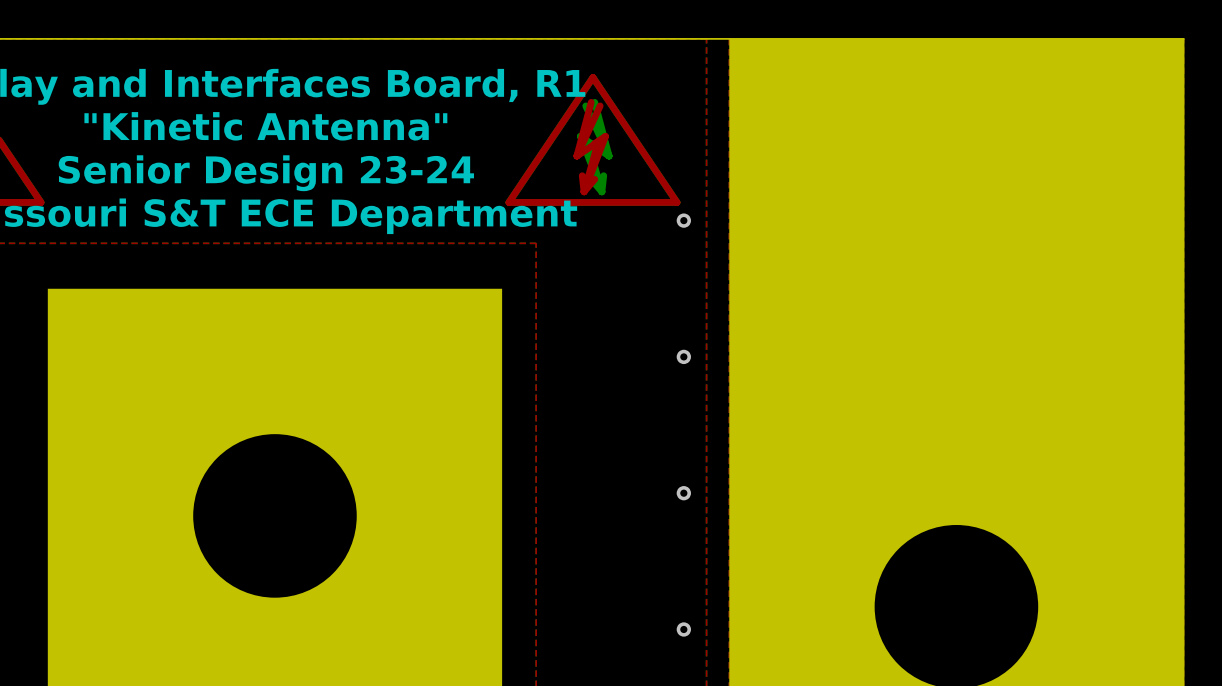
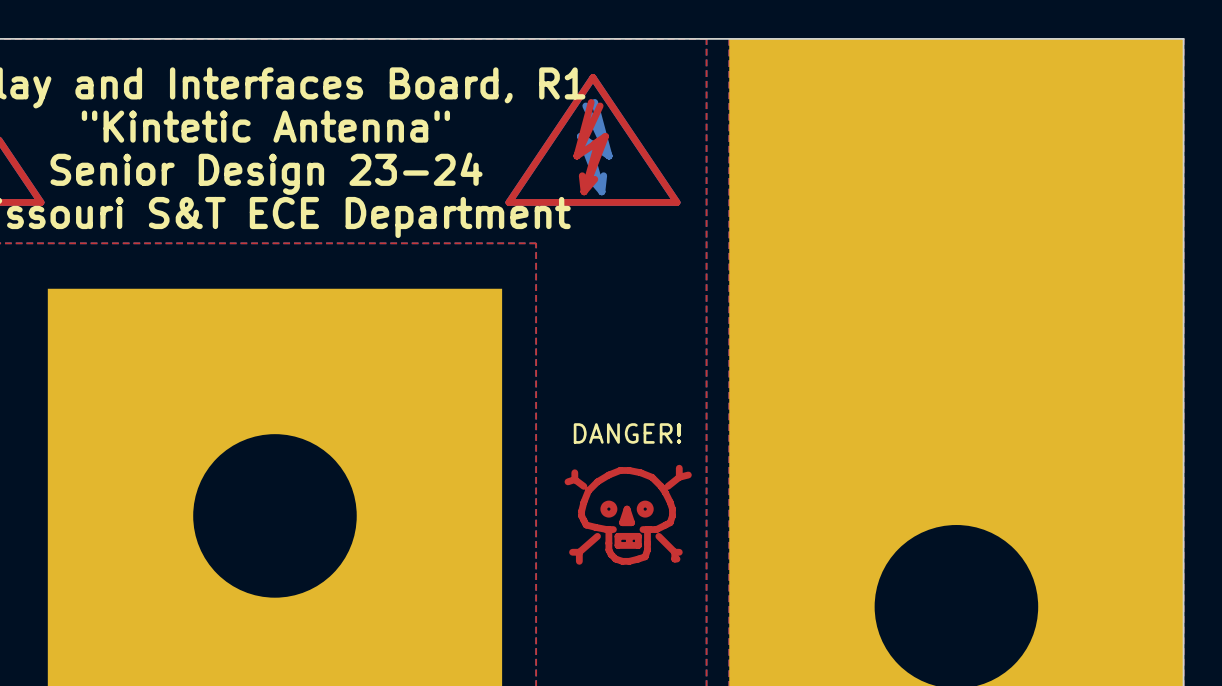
text: "Kinetic Antenna" (265, 126) -> "Kintetic Antenna" (265, 126)
via: (683, 220) -> none
via: (683, 356) -> none
via: (683, 493) -> none
DANGER!: none -> (628, 514)
via: (683, 629) -> none

